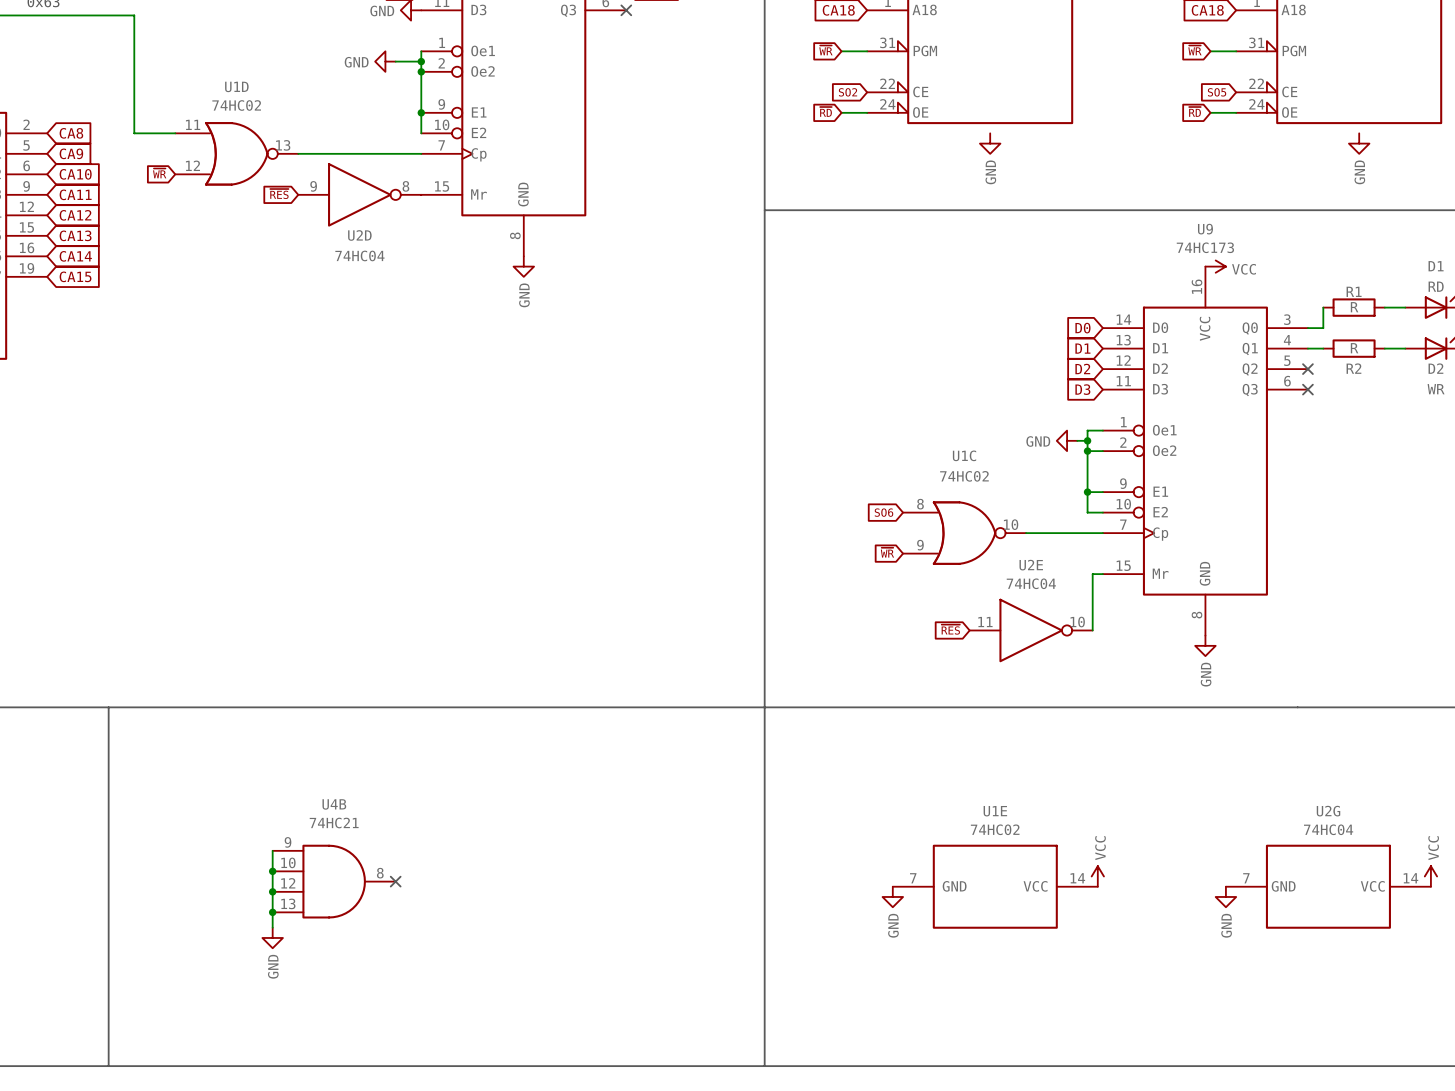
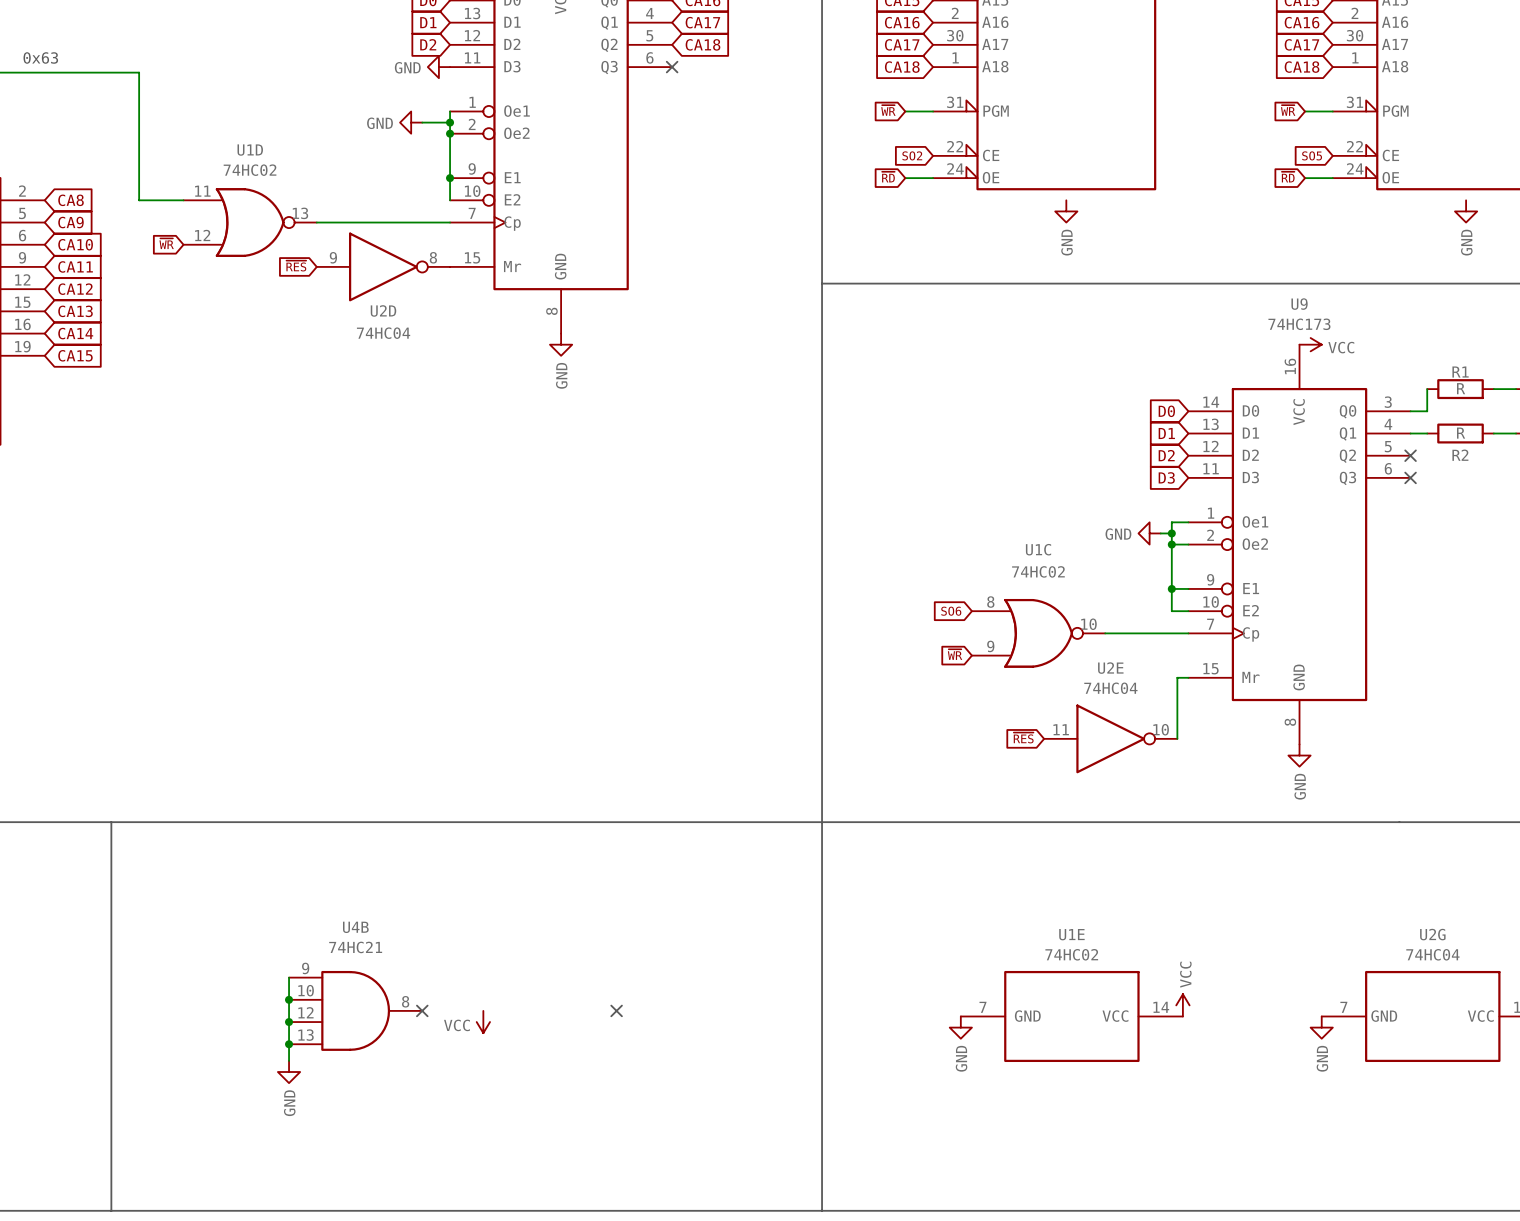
no-connect mark: none -> (616, 1010)
power symbol: none -> VCC (483, 1022)

